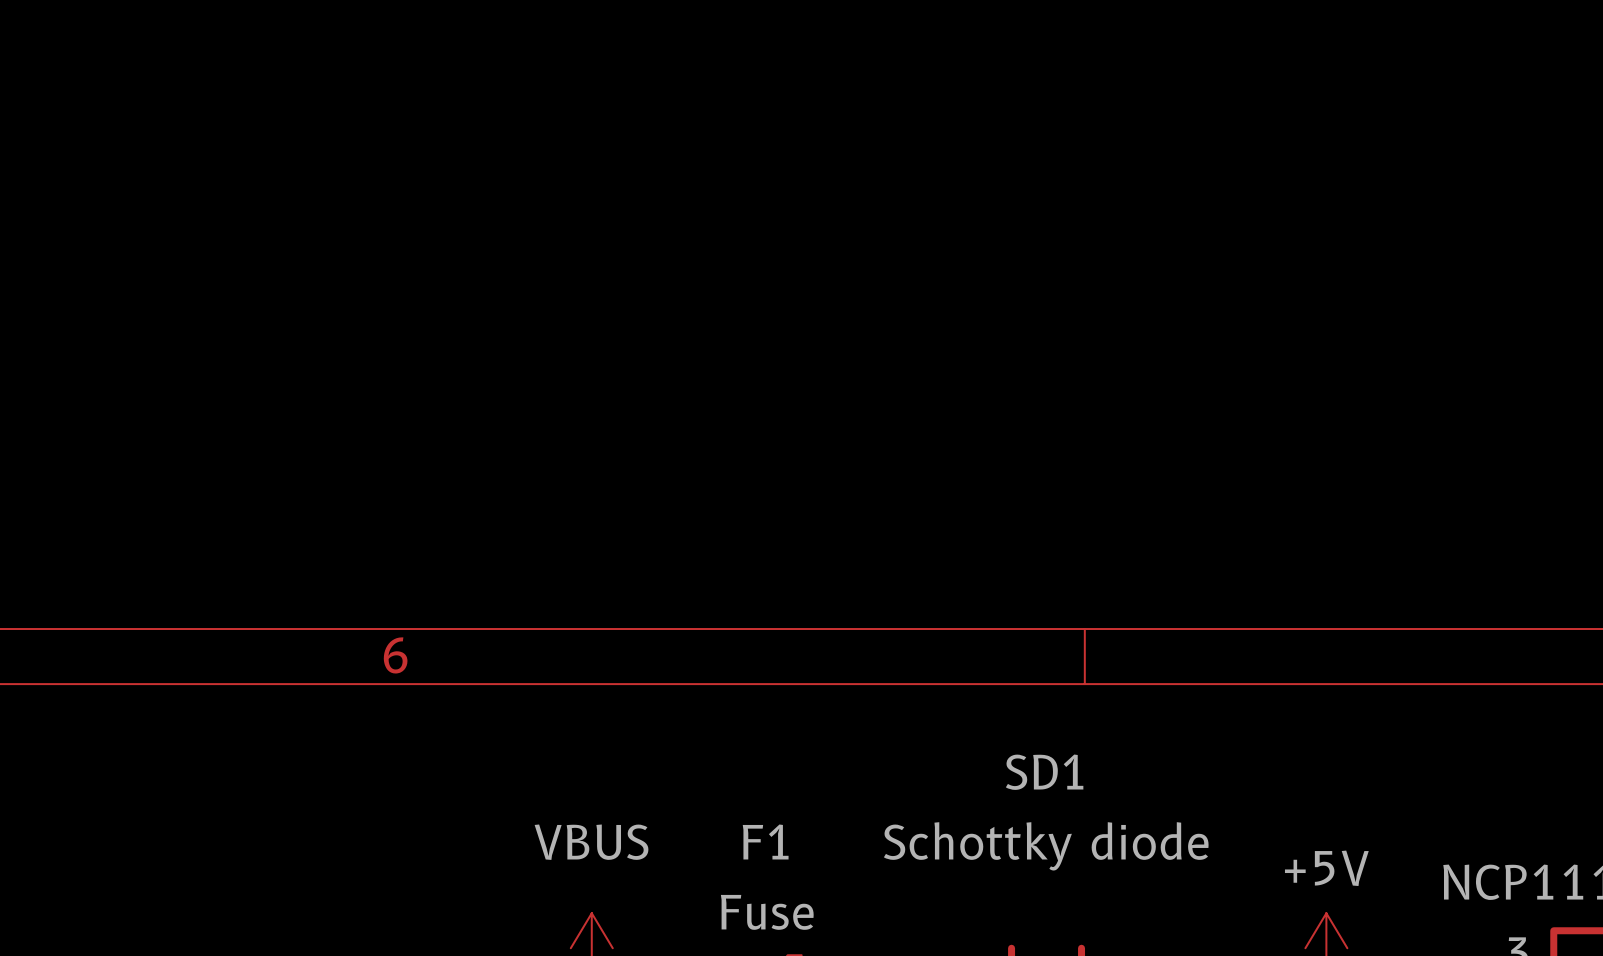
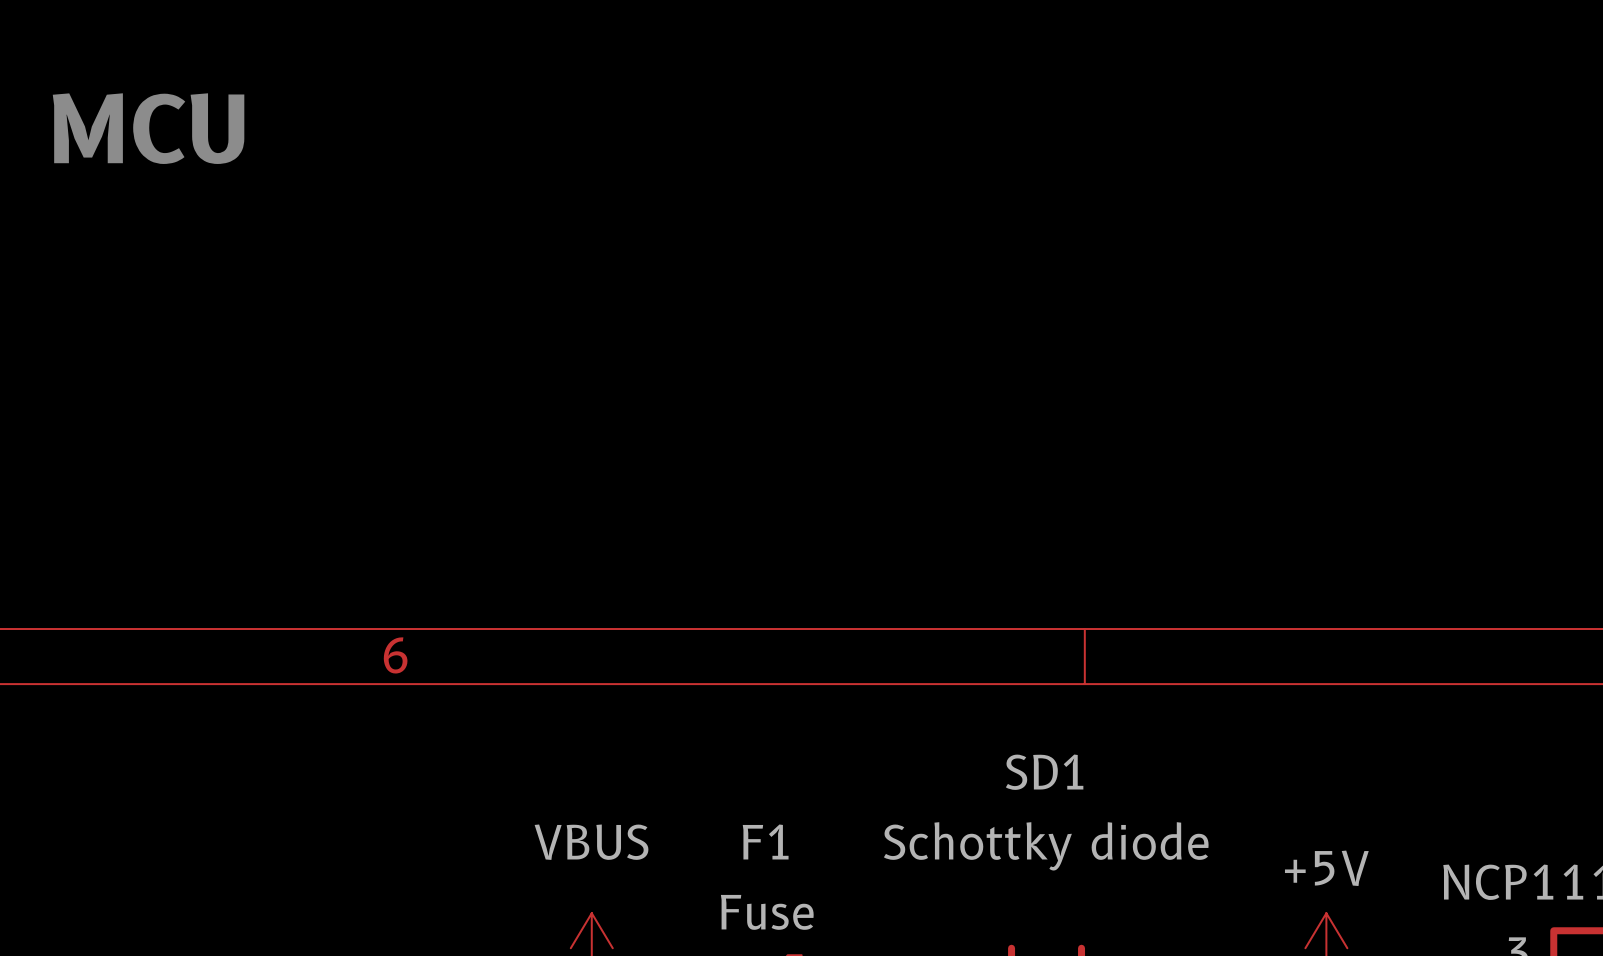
text: none -> MCU (148, 128)

